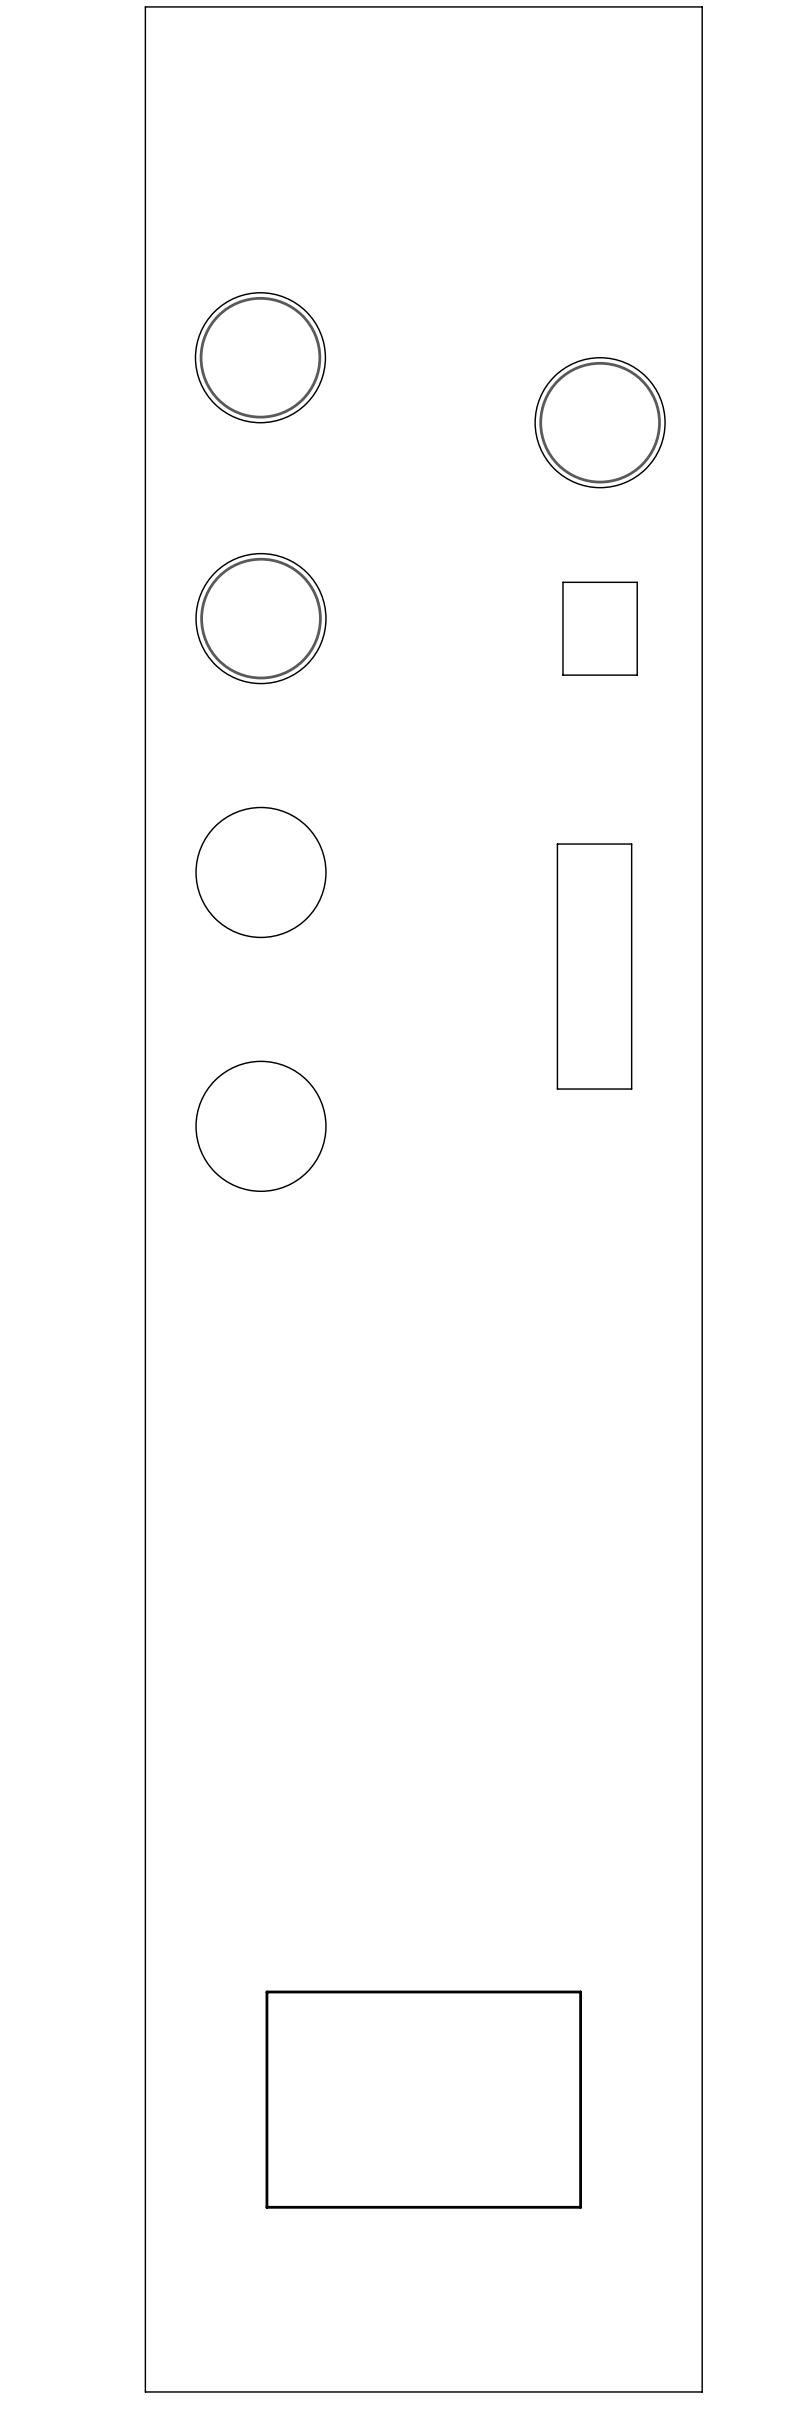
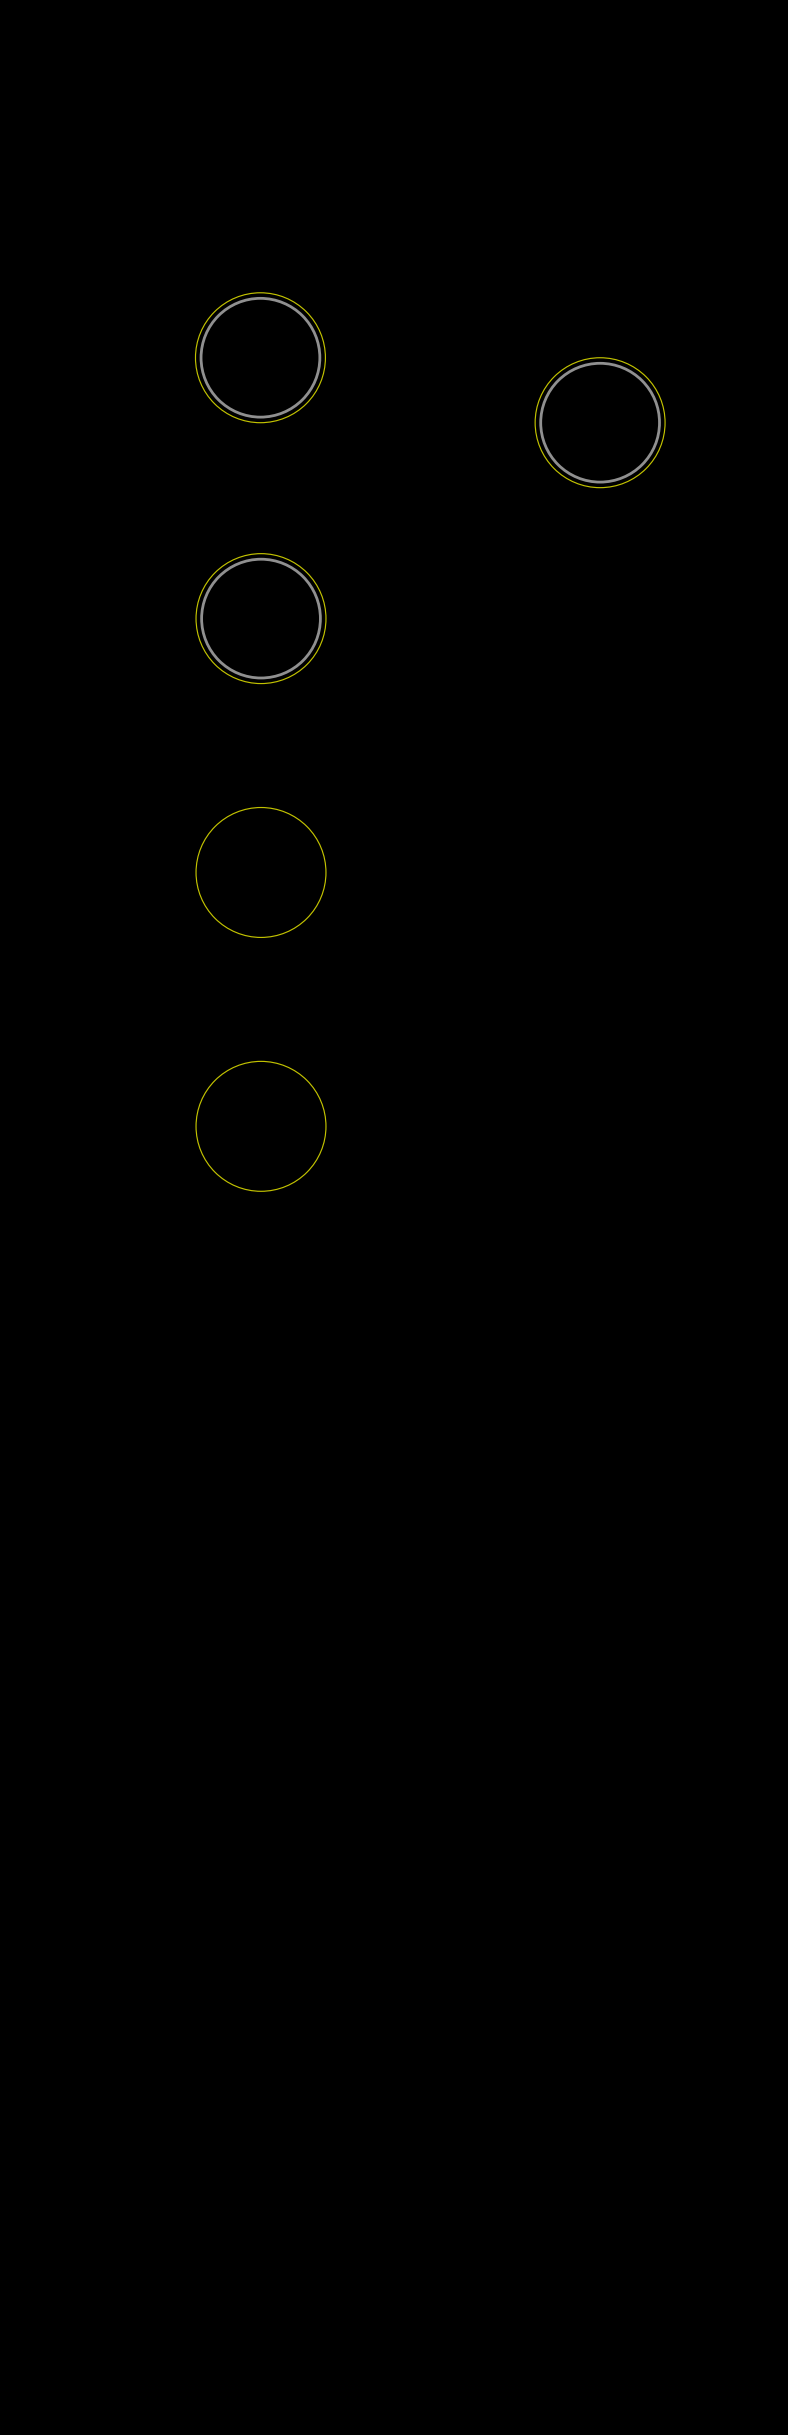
board edge: (145, 6) (702, 6) (702, 2391) (145, 2391) (145, 6) -> none
board edge: (562, 582) (637, 582) (637, 675) (562, 675) (562, 582) -> none
board edge: (557, 844) (631, 844) (631, 1089) (557, 1089) (557, 844) -> none
board edge: (266, 1991) (580, 1991) (580, 2207) (266, 2207) (266, 1991) -> none

